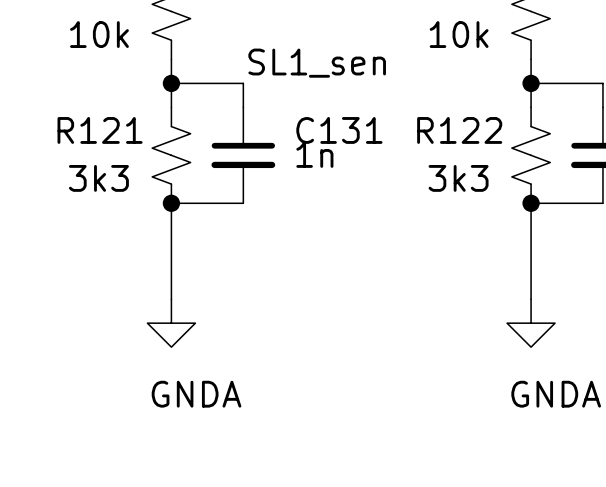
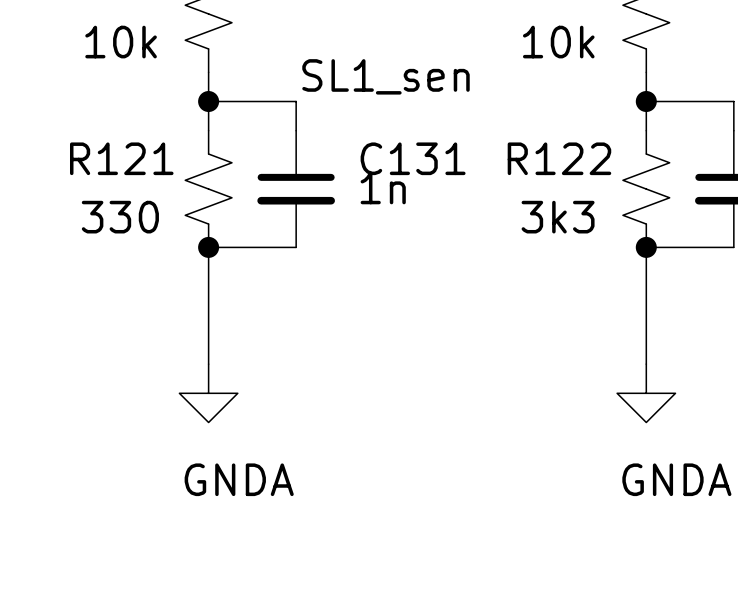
R121 value: 3k3 (98, 178) -> 330 (120, 217)

